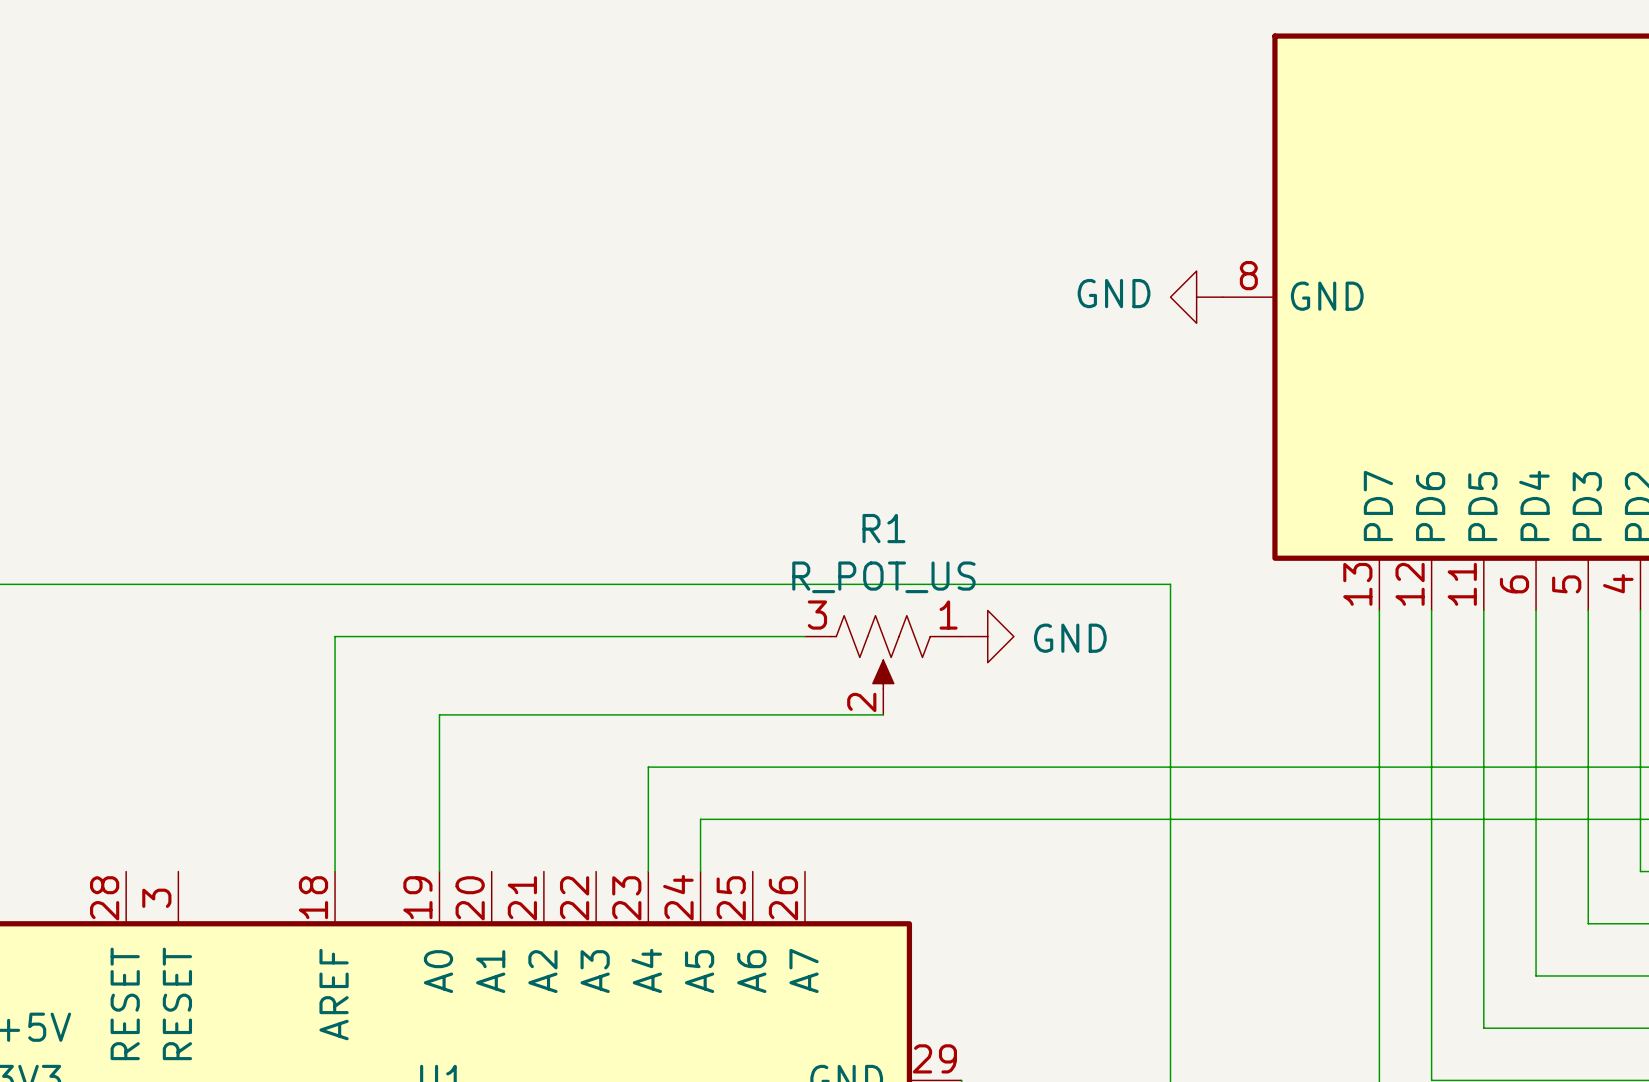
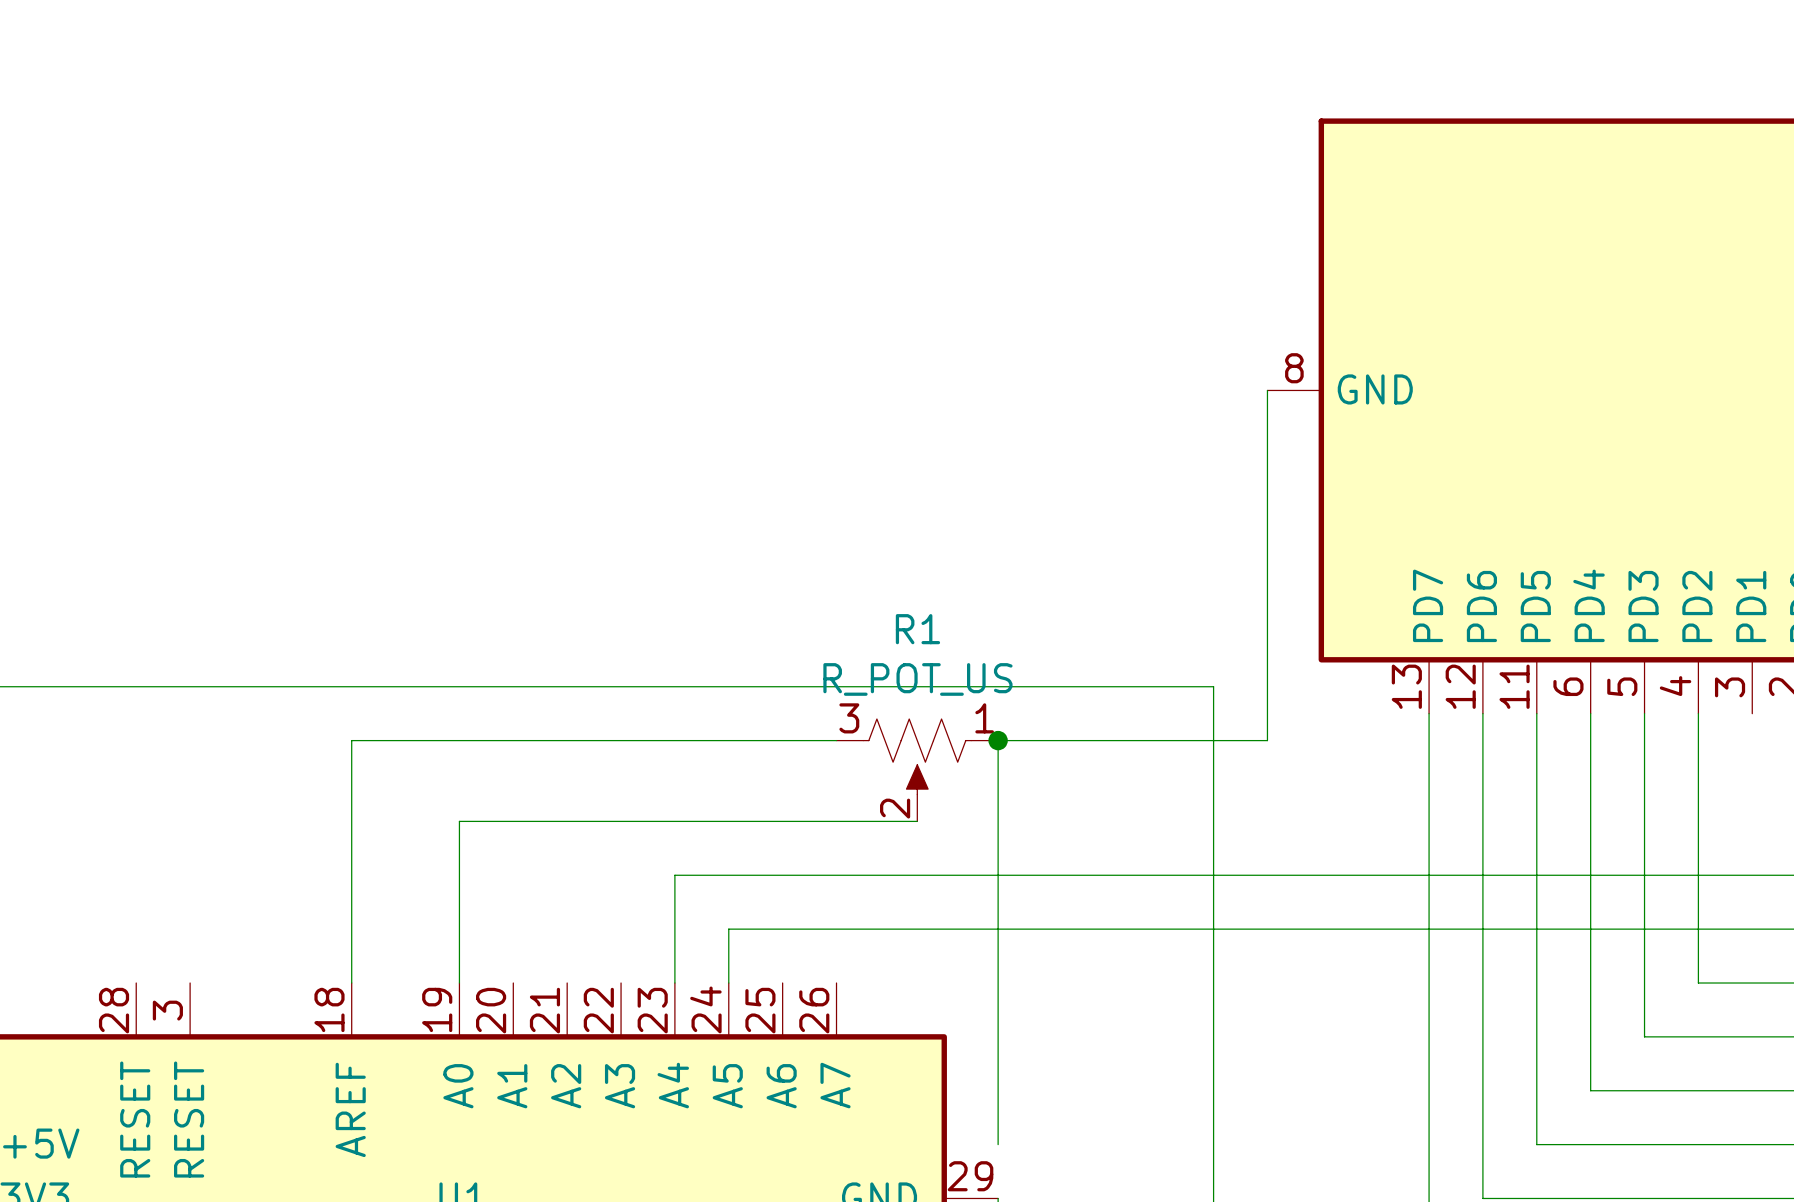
power symbol: GND (1196, 297) -> none
wire: none -> (1267, 390) (1267, 740) (998, 740) (998, 1144)
junction: none -> (998, 740)
power symbol: GND (987, 636) -> none

